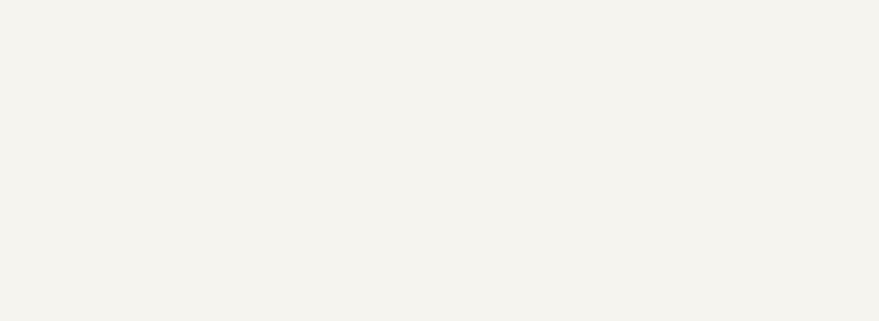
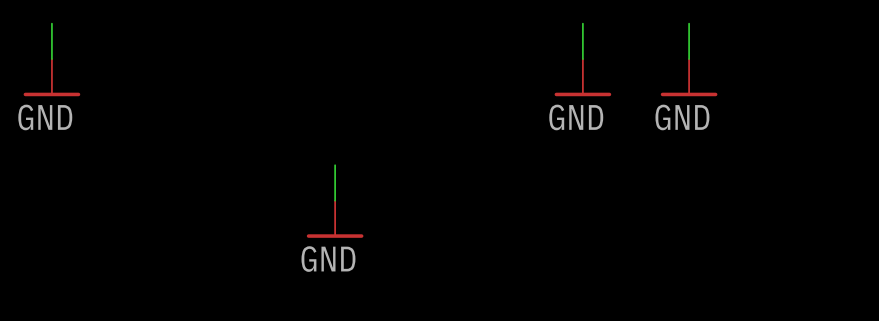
wire: none -> (51, 23) (51, 59)
wire: none -> (582, 23) (582, 59)
wire: none -> (689, 23) (689, 59)
power symbol: none -> GND (51, 77)
power symbol: none -> GND (582, 77)
power symbol: none -> GND (689, 77)
wire: none -> (335, 165) (335, 200)
power symbol: none -> GND (335, 219)

